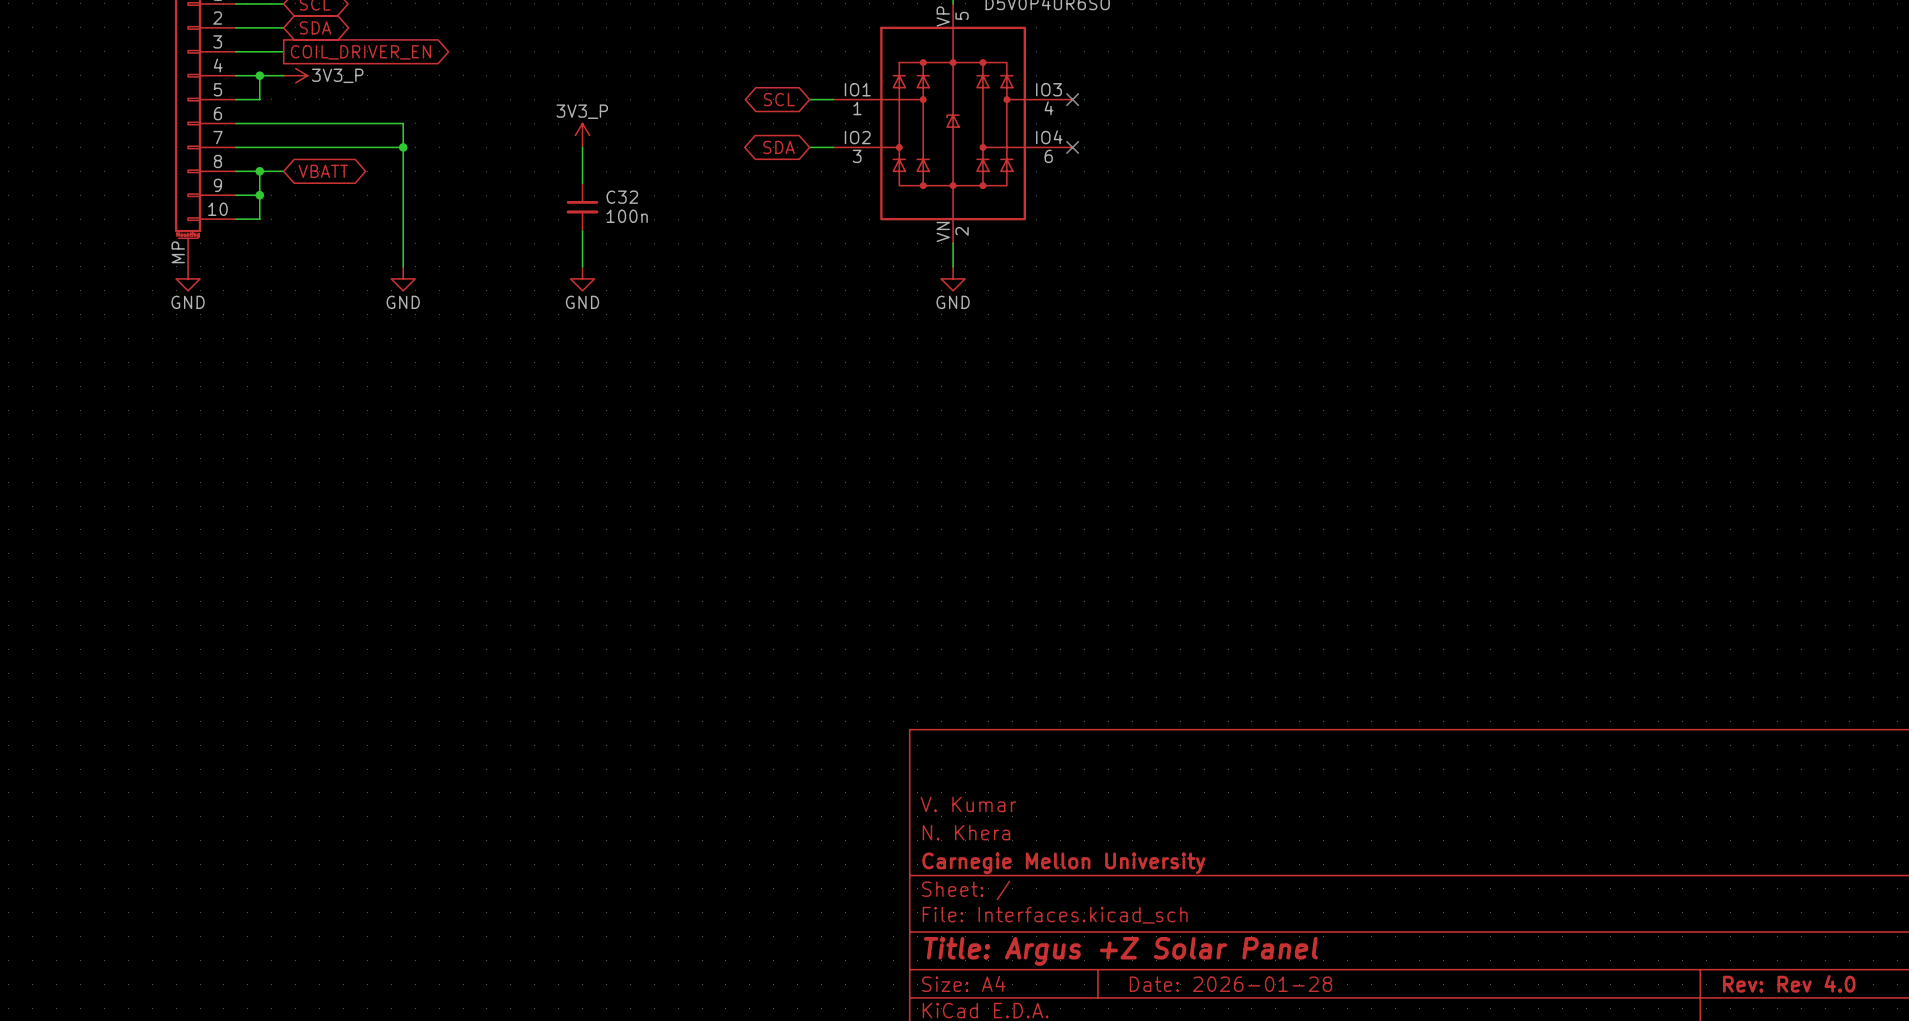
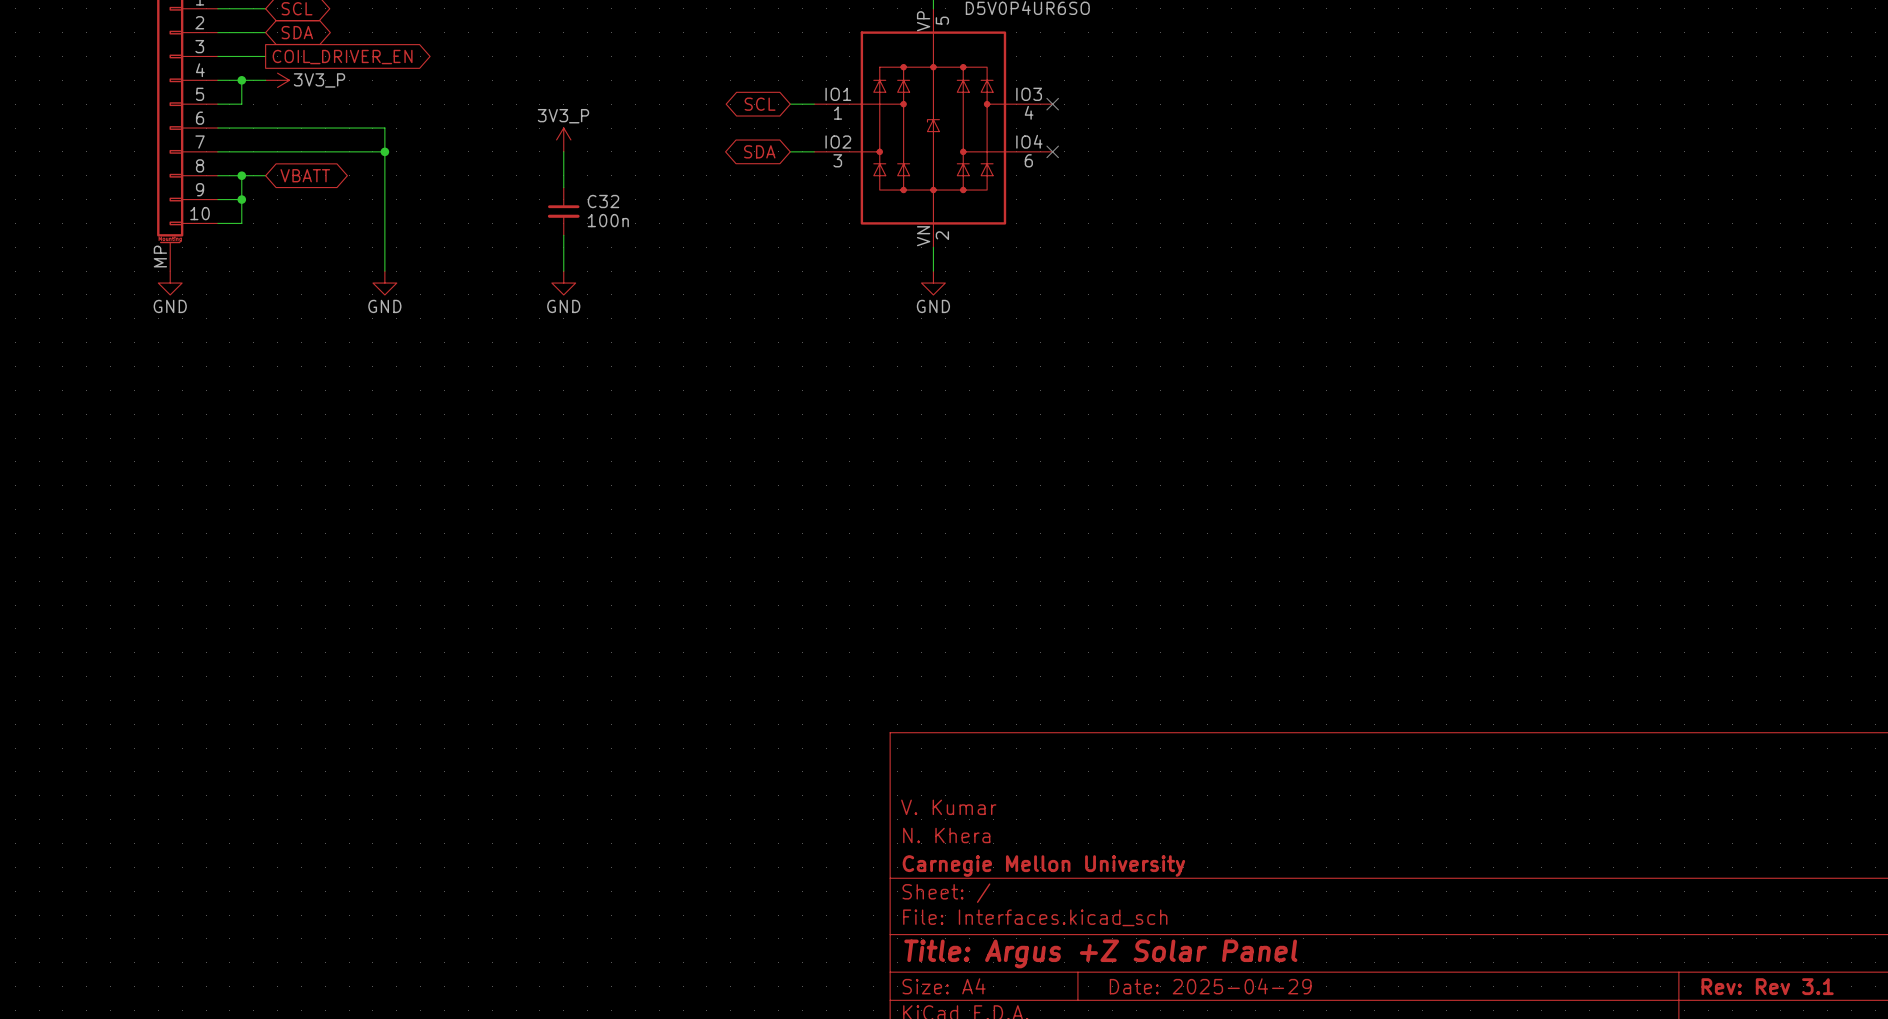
title block: Rev: Rev 4.0 (1789, 983) -> Rev: Rev 3.1 (1767, 986)
title block: Date: 2026-01-28 (1230, 984) -> Date: 2025-04-29 (1210, 986)

